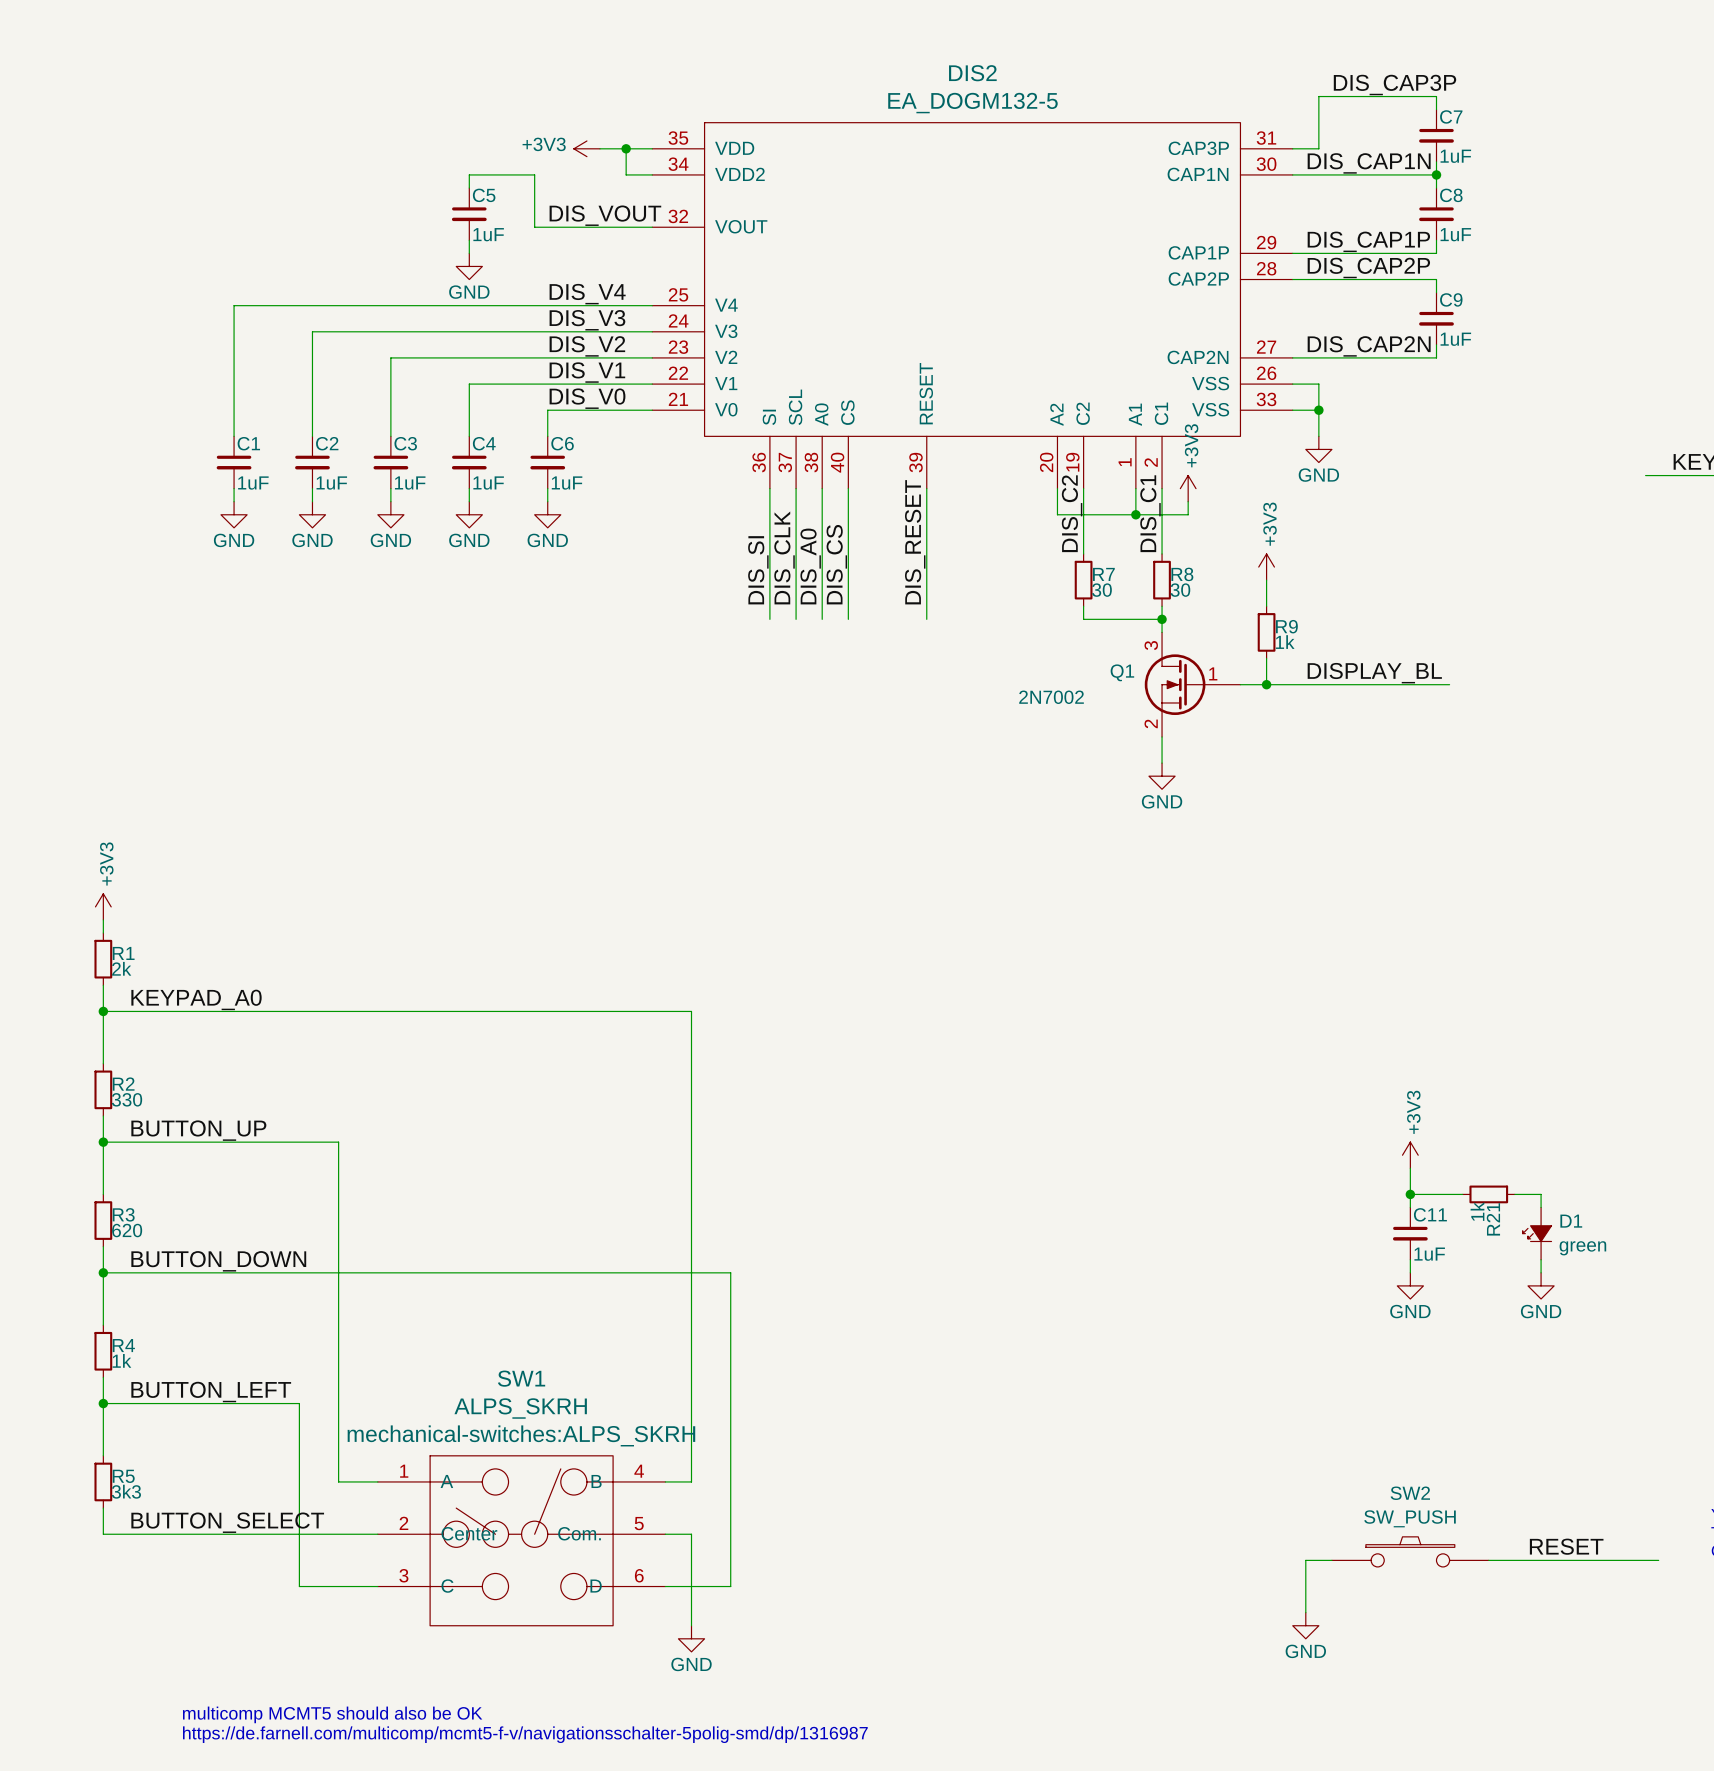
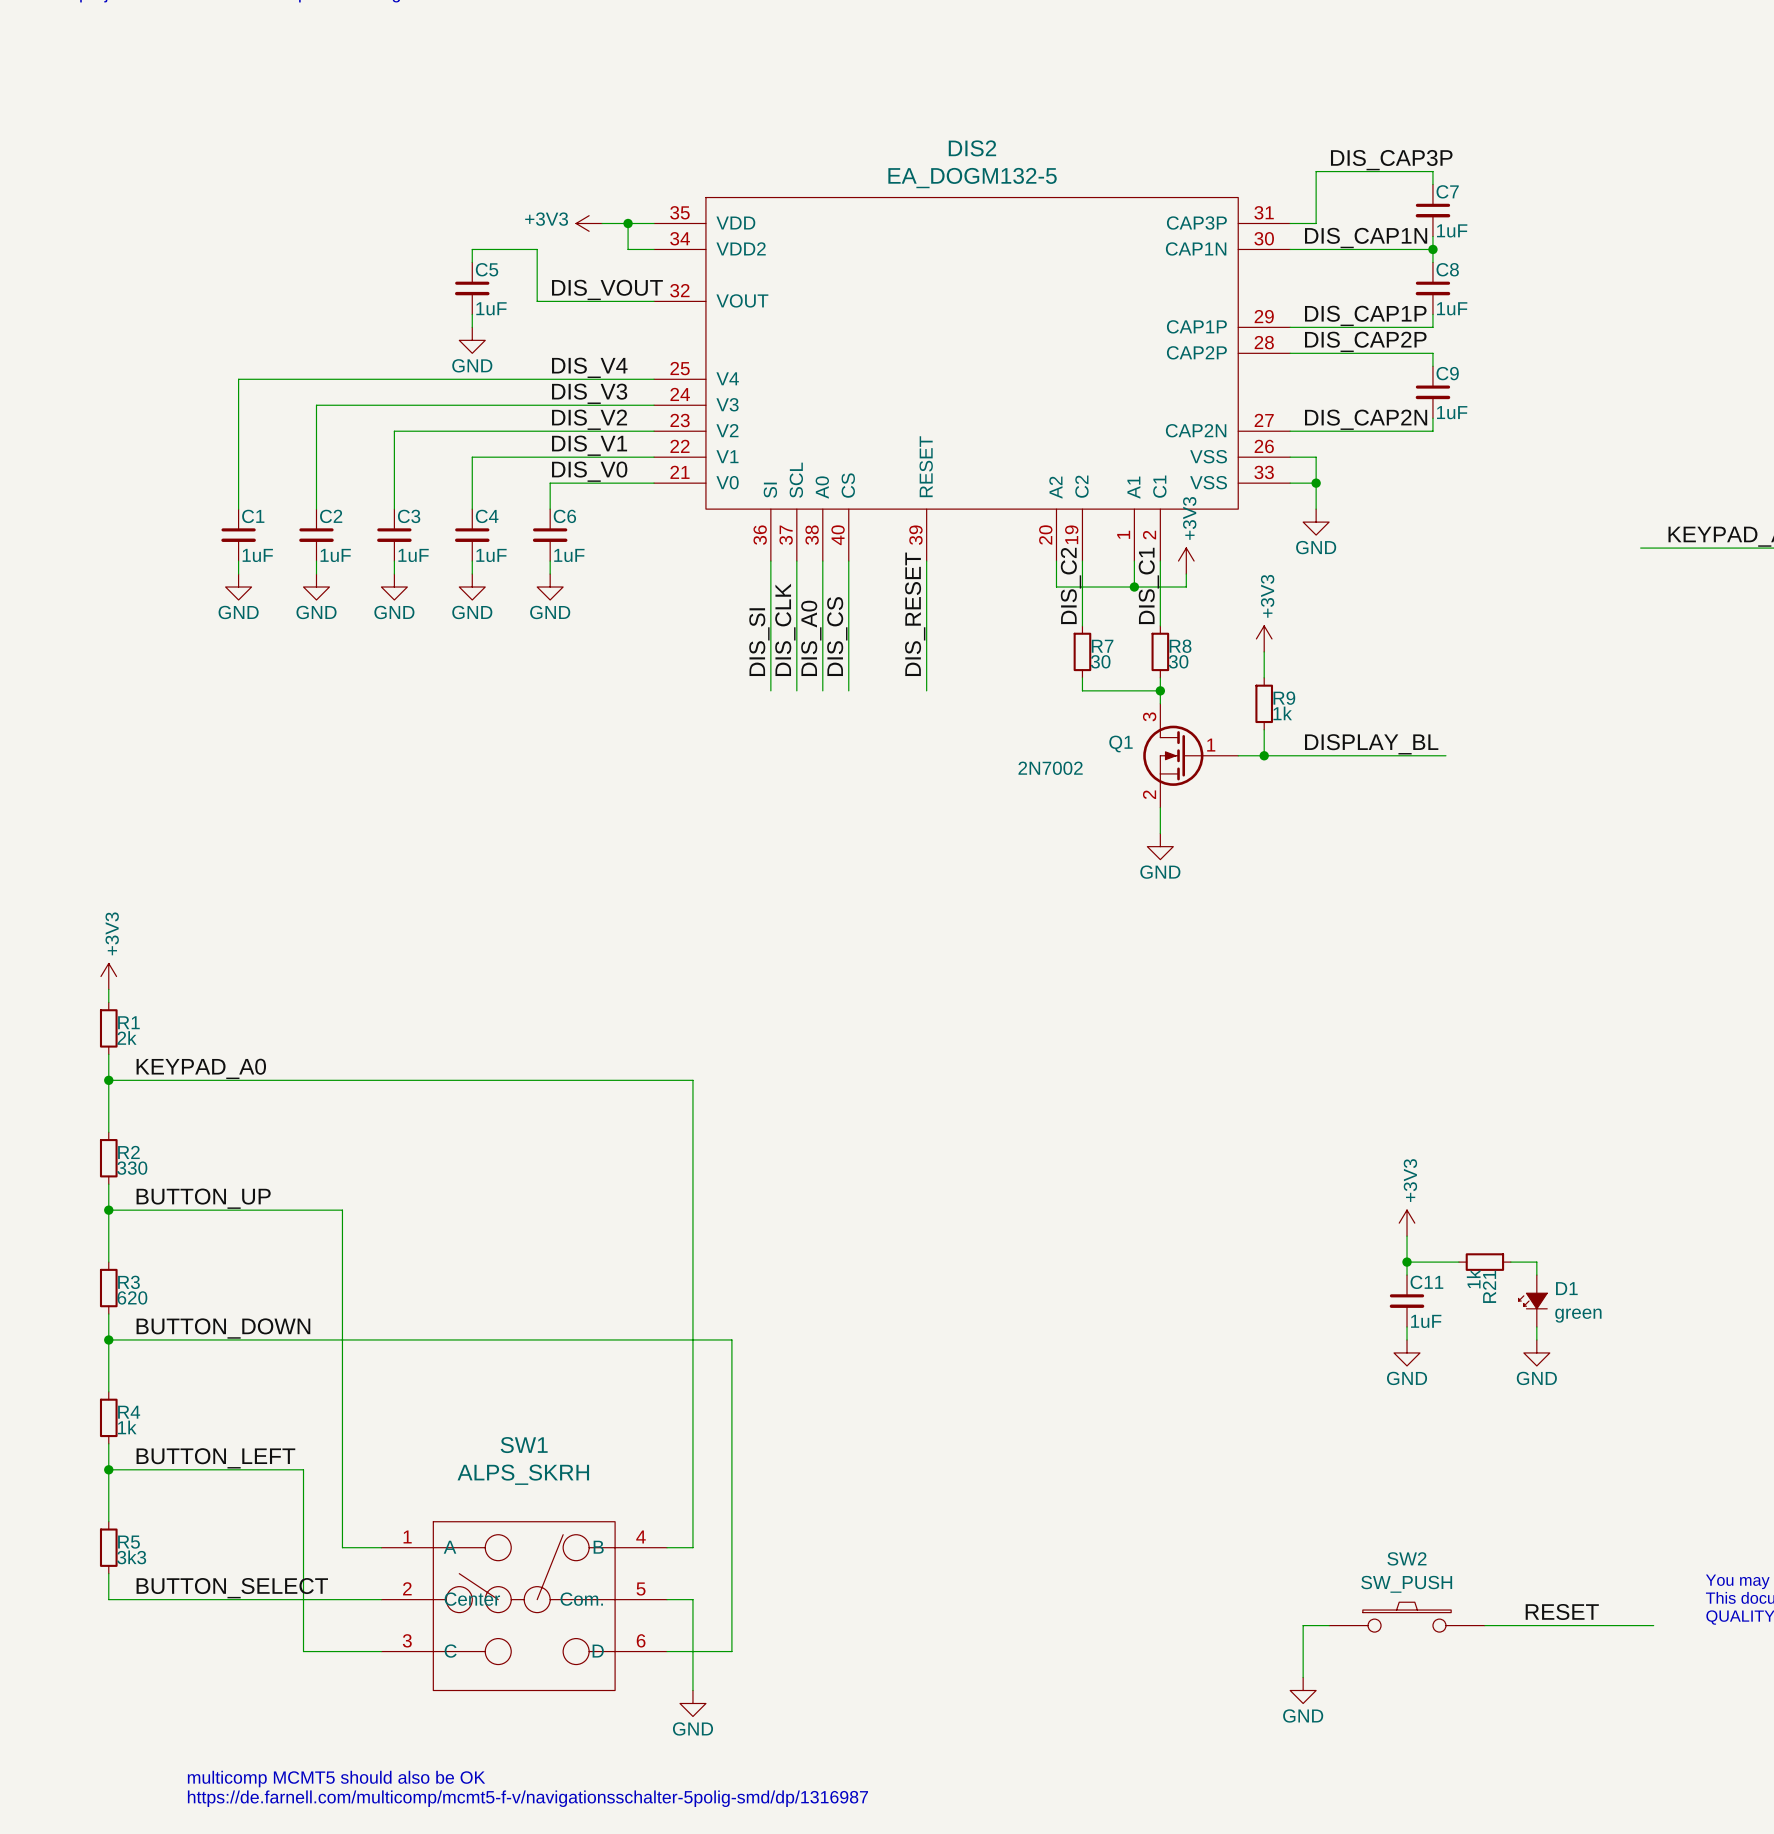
SW1 text: mechanical-switches:ALPS_SKRH (521, 1435) -> none

